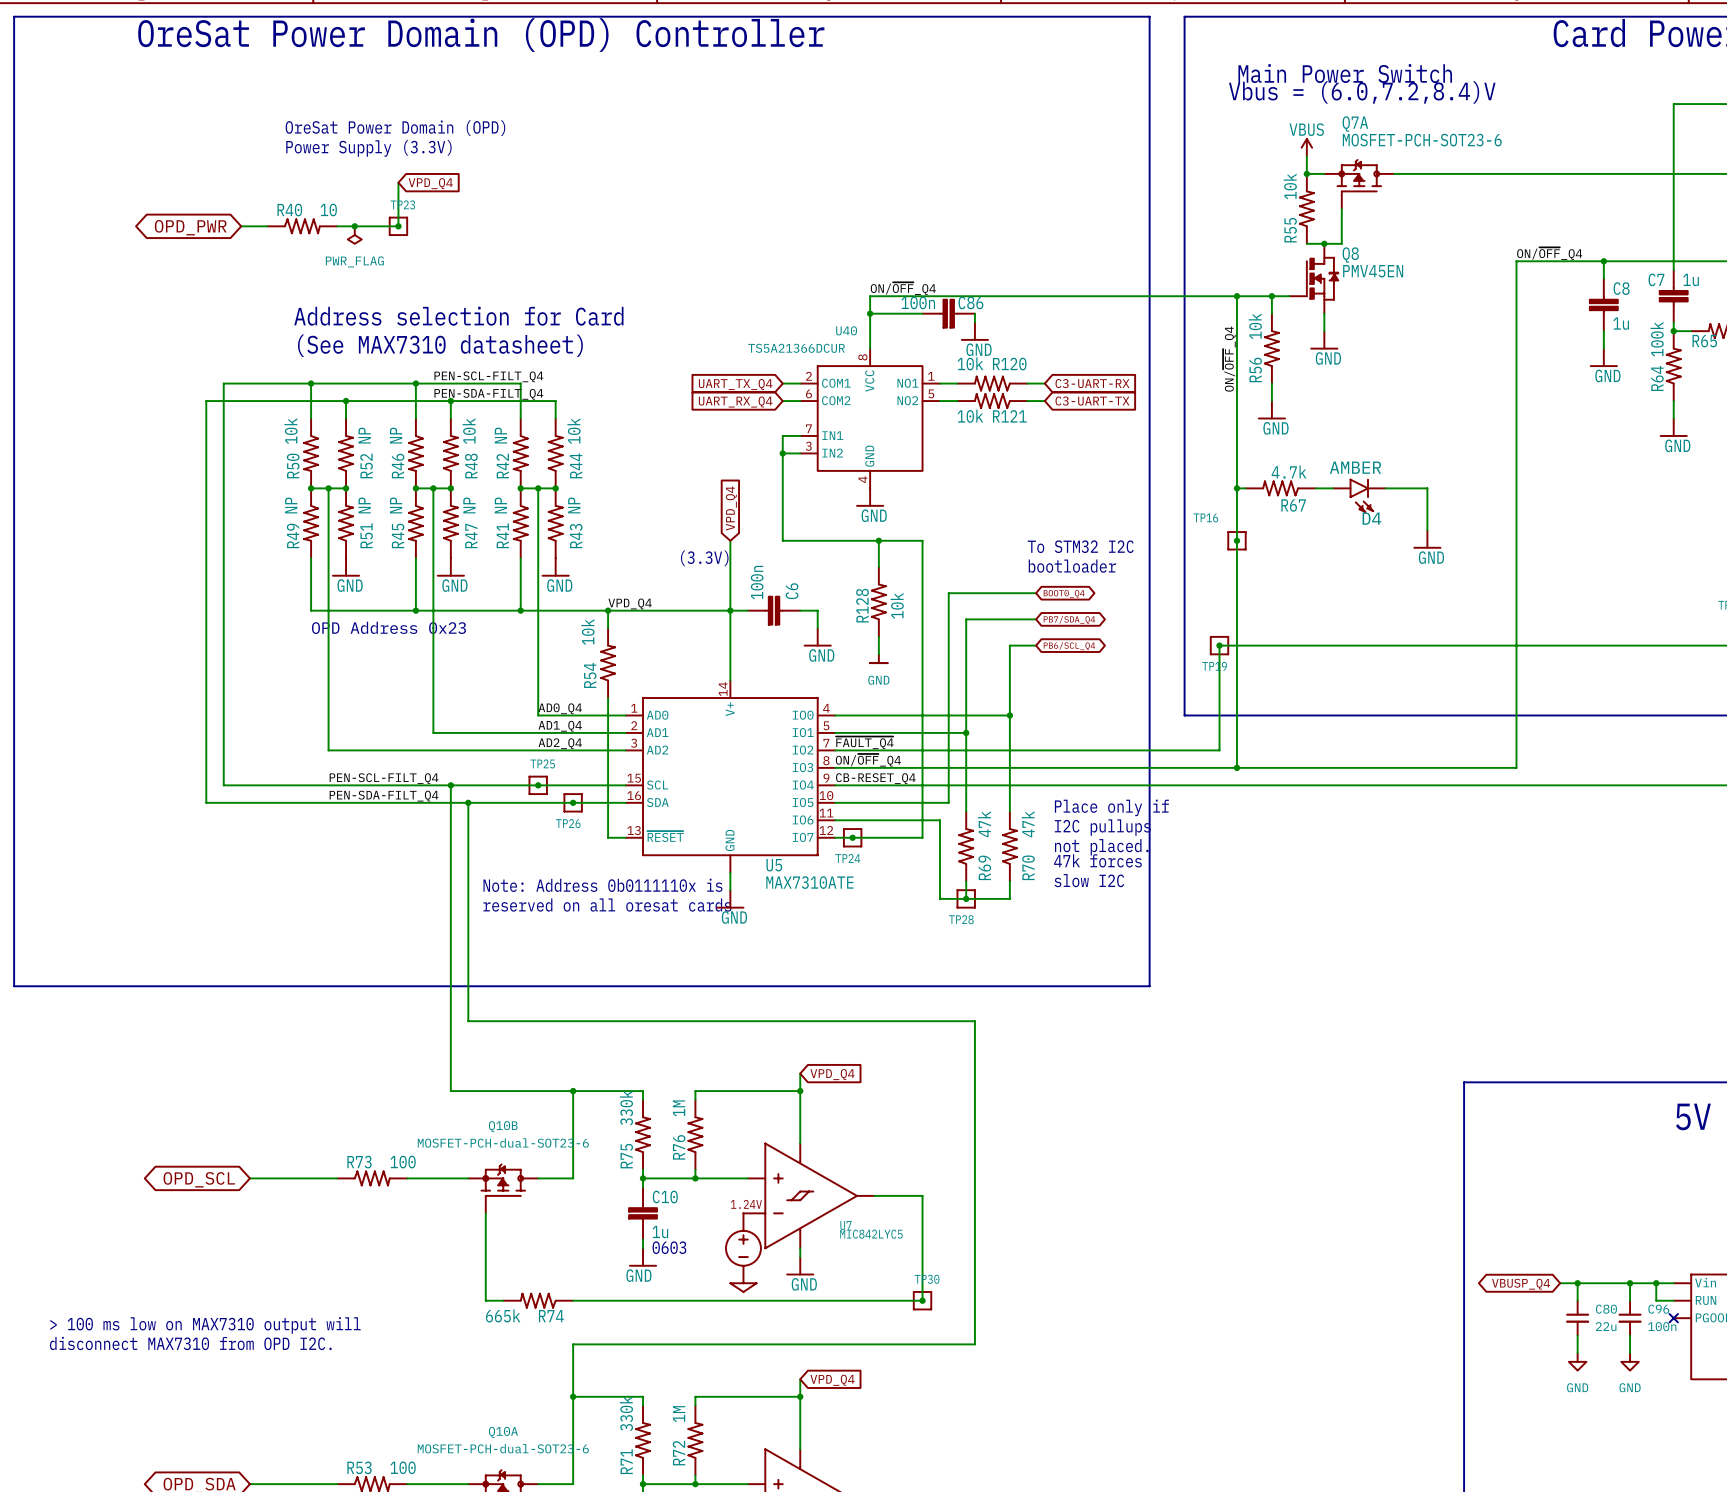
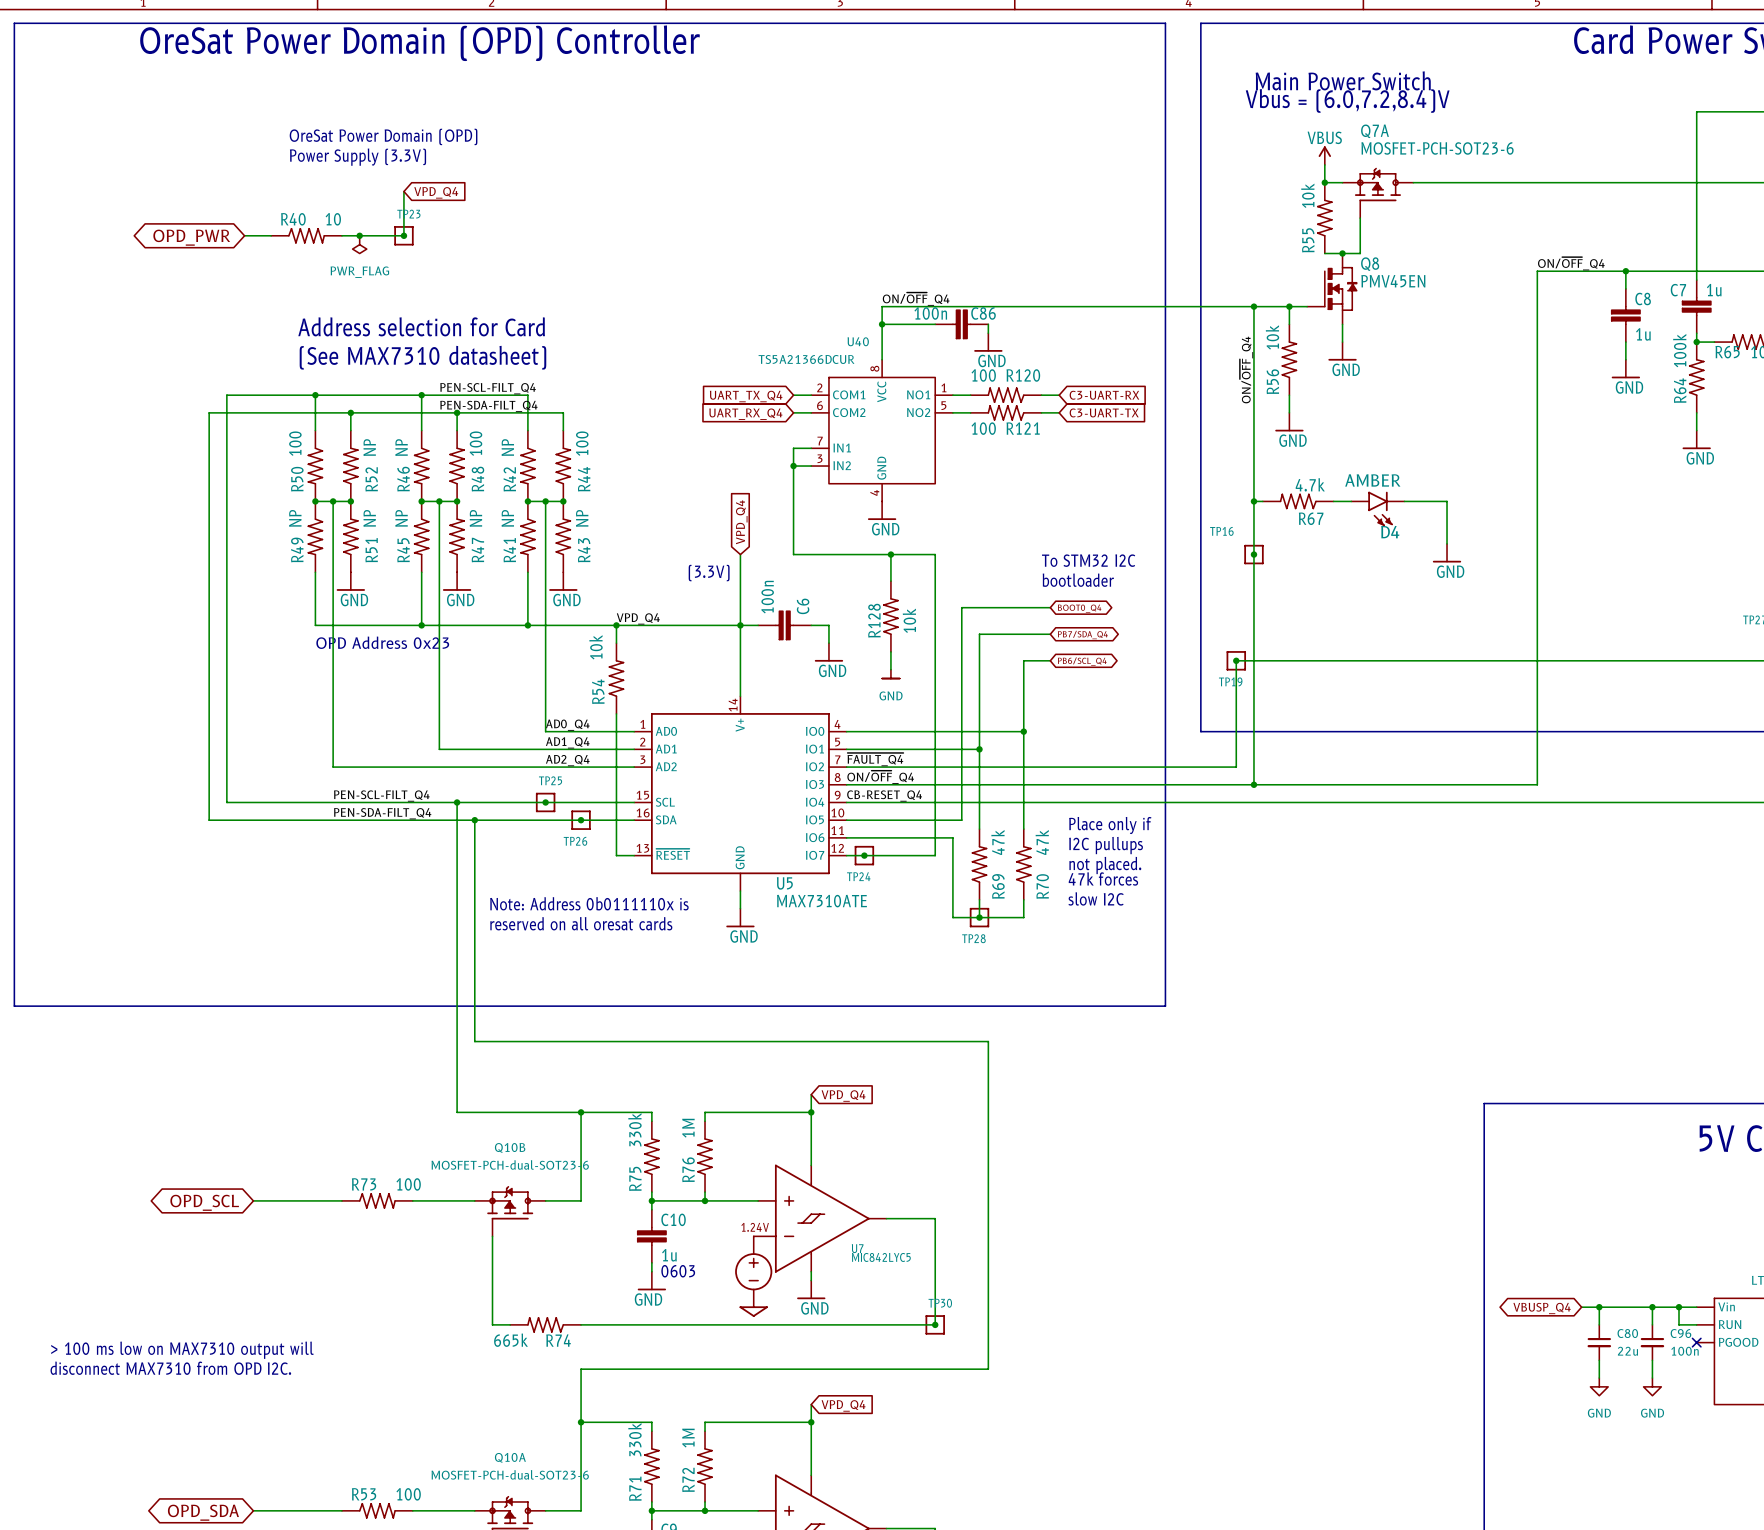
R120 value: 10k (970, 363) -> 100 (983, 375)
R121 value: 10k (970, 416) -> 100 (983, 428)
R50 value: 10k (290, 431) -> 100 (295, 443)
R48 value: 10k (469, 431) -> 100 (476, 443)
R44 value: 10k (574, 431) -> 100 (582, 443)

